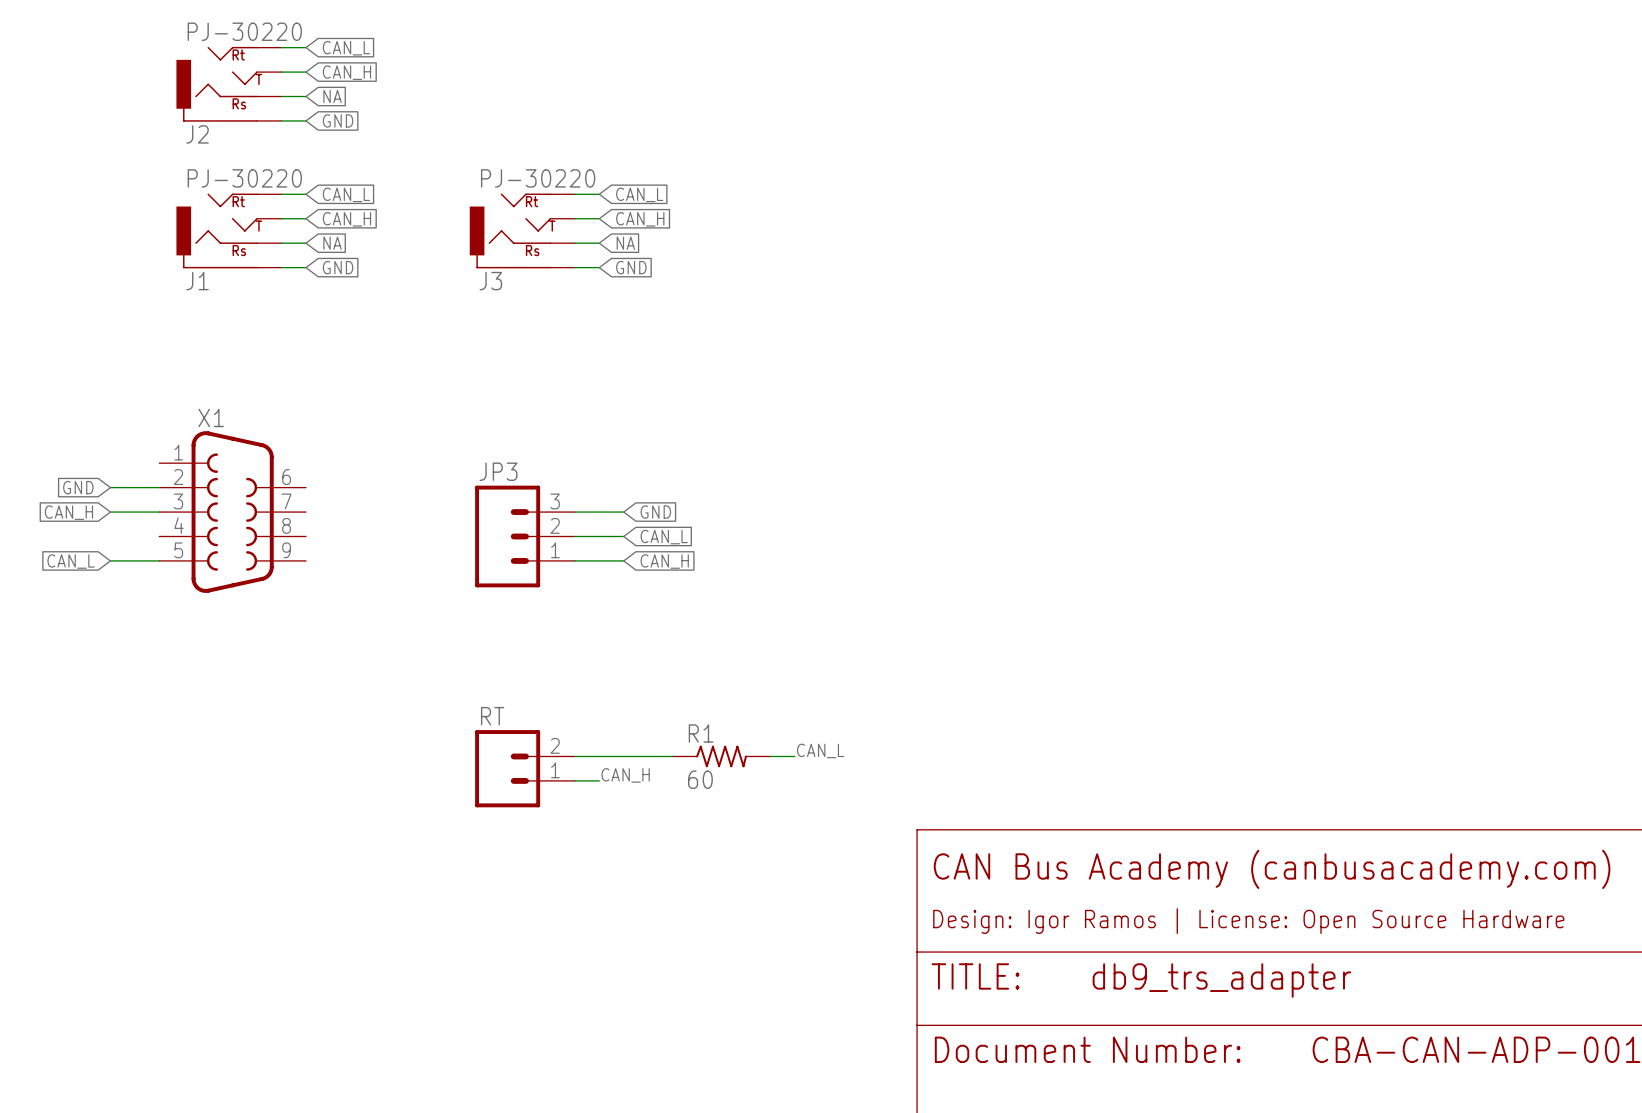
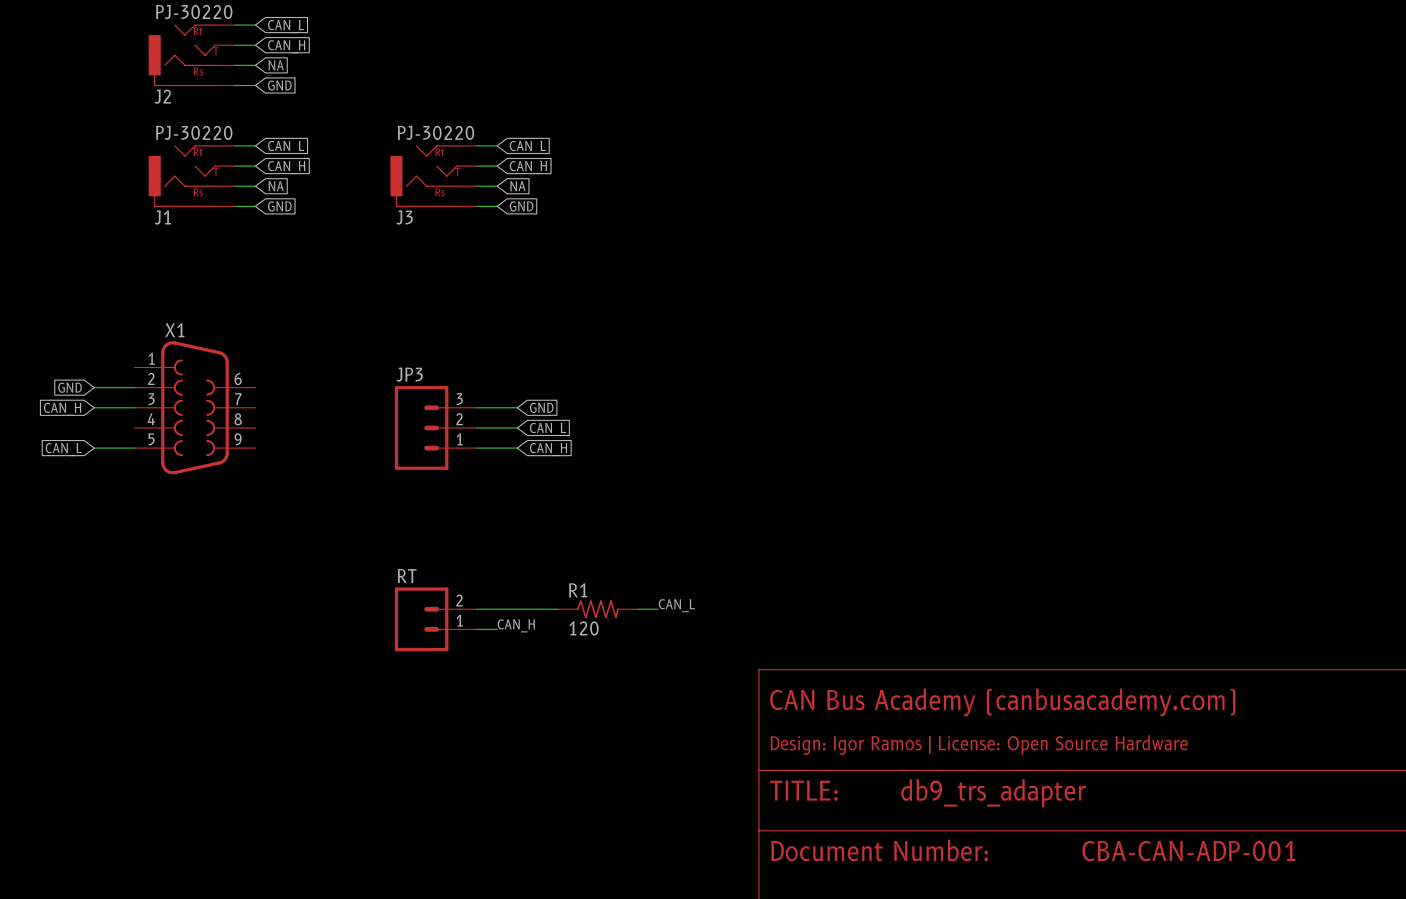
R1 value: 60 (700, 779) -> 120 (583, 628)

